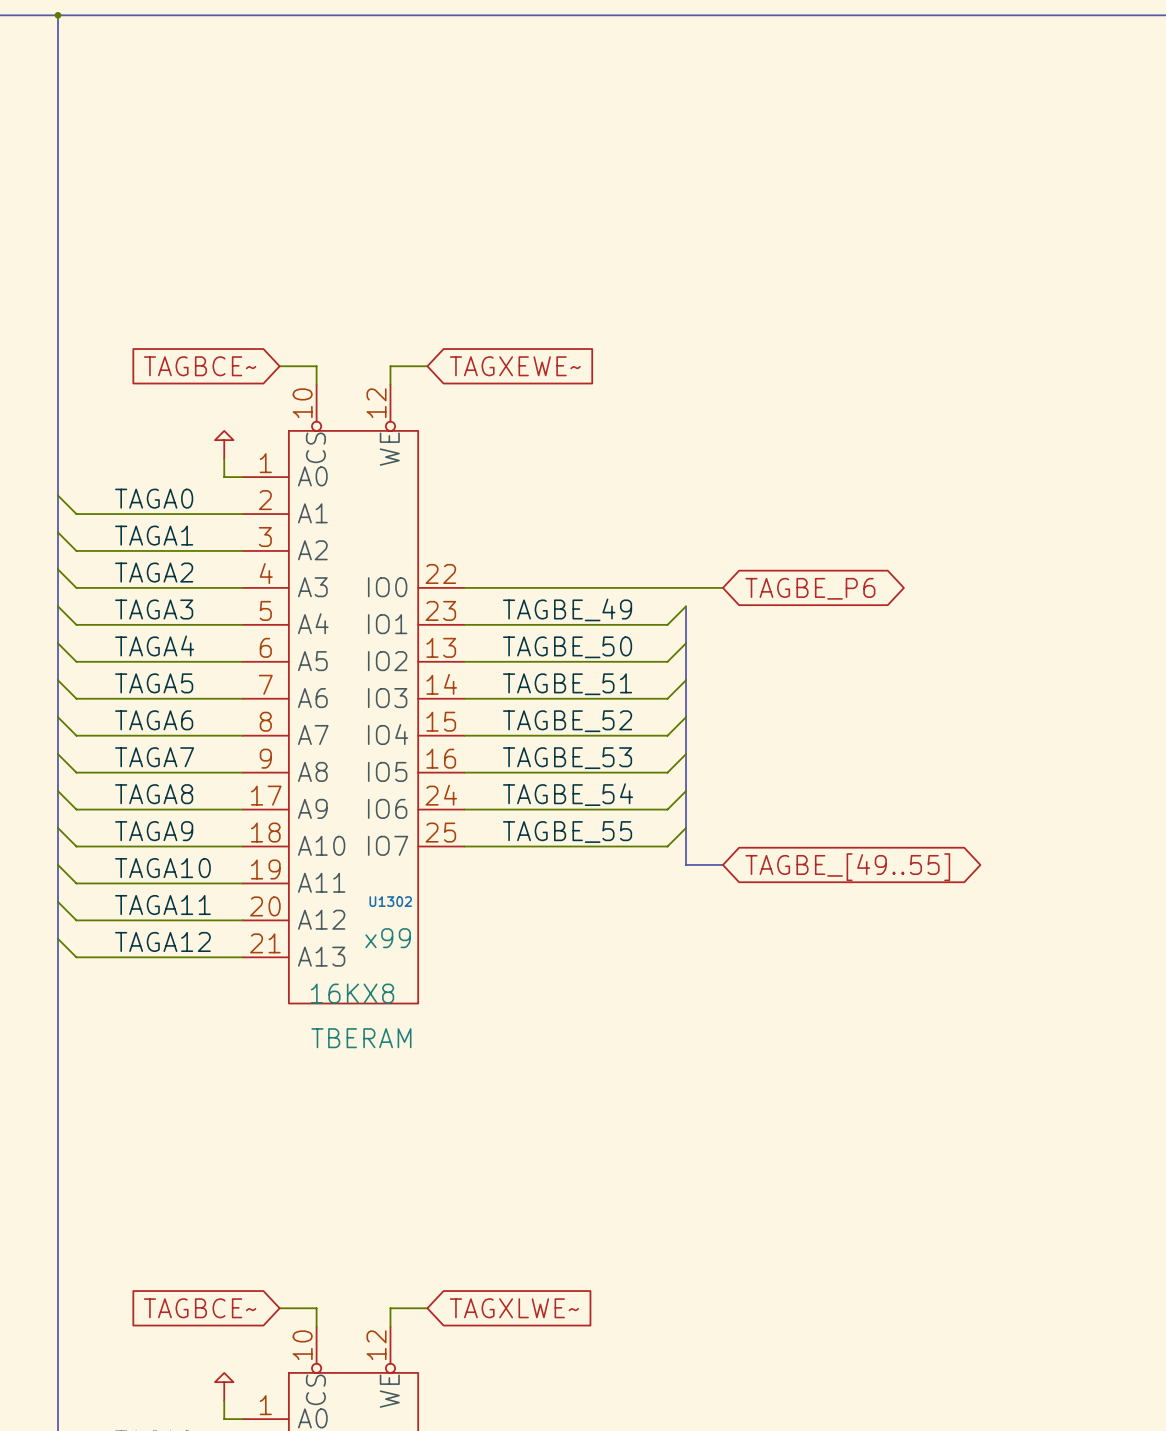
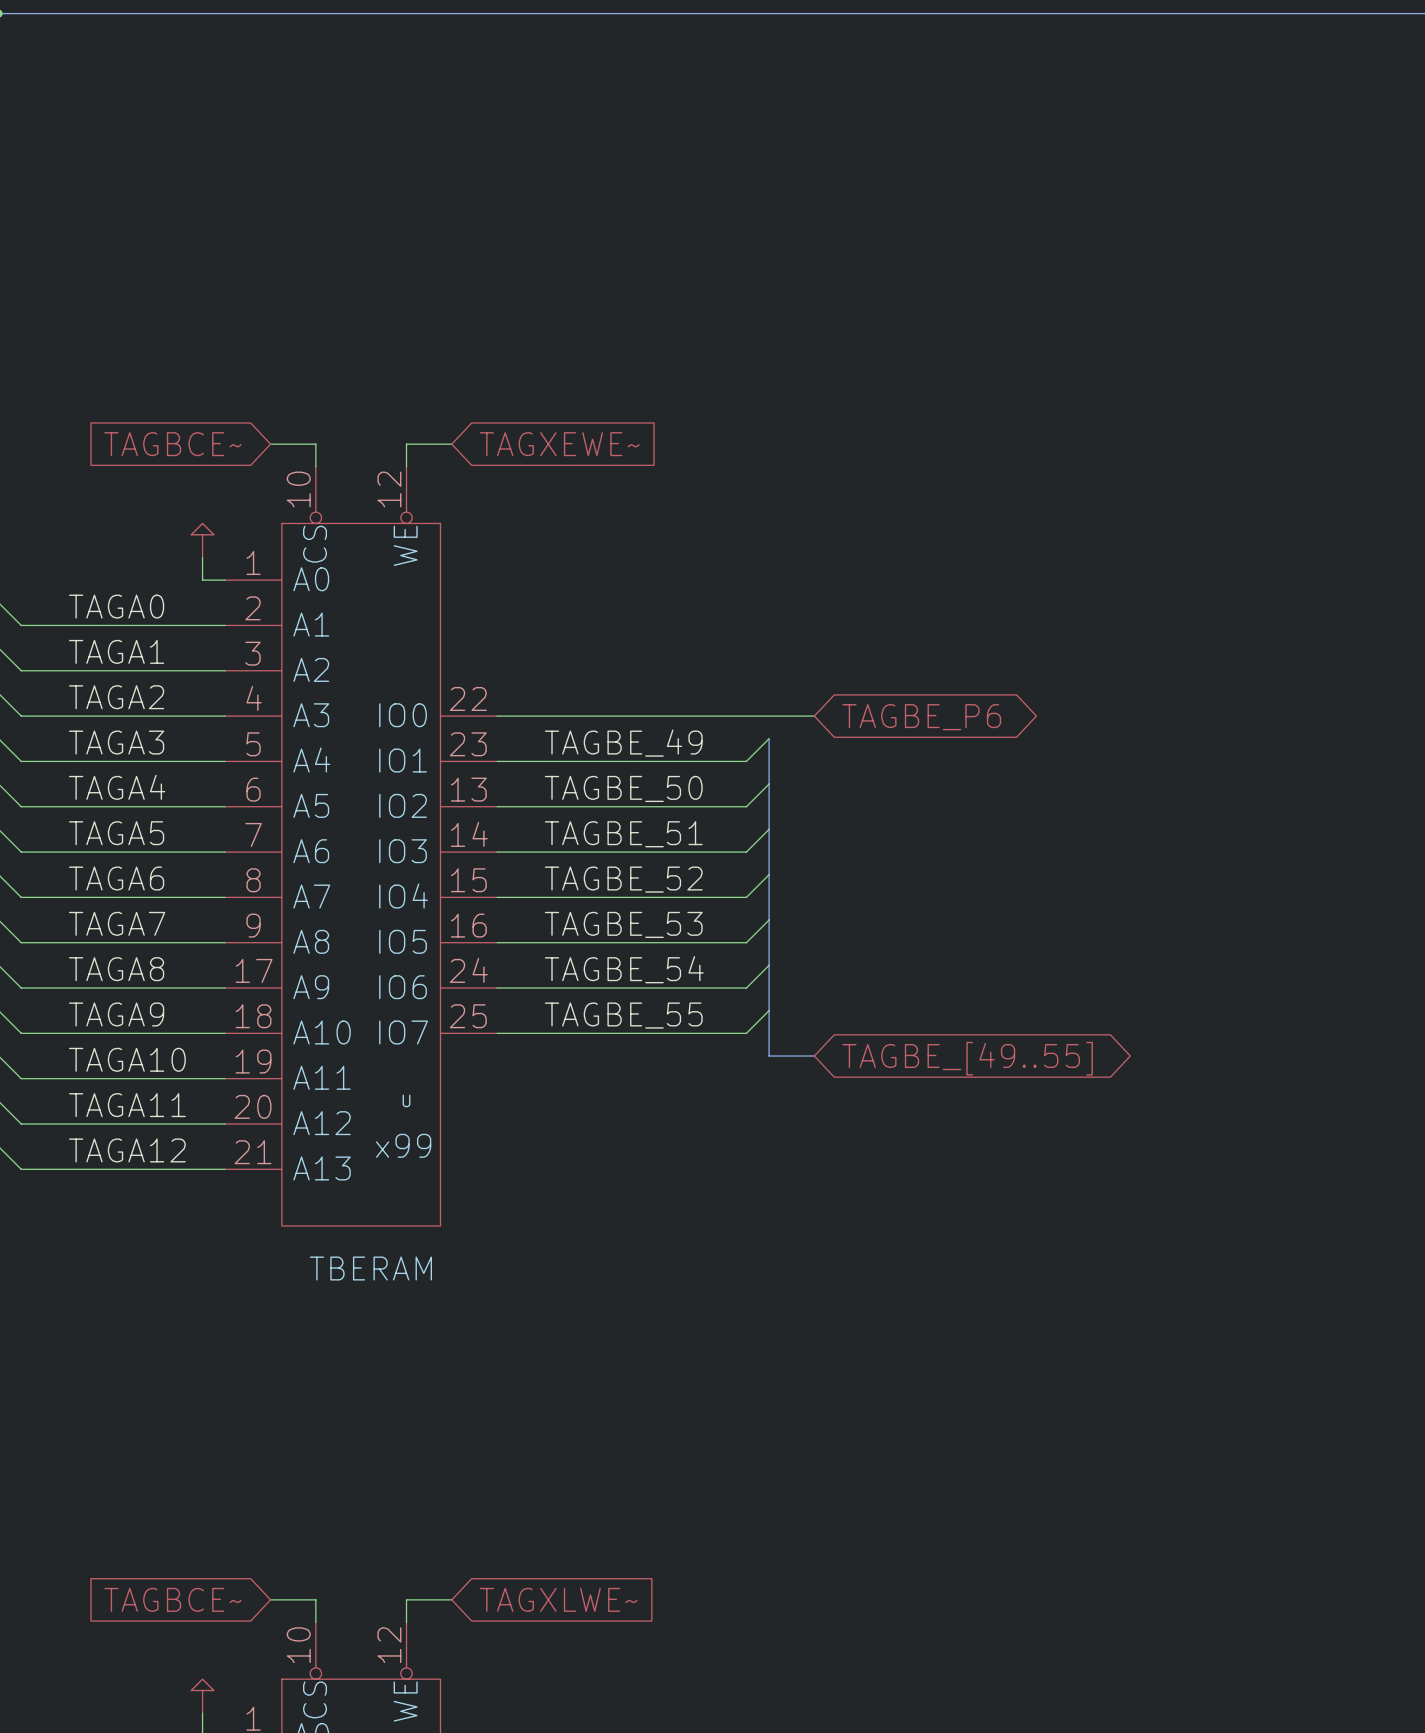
U1302 name: U1302 (390, 901) -> U (406, 1100)
U1302 value: 16KX8 (352, 993) -> none

